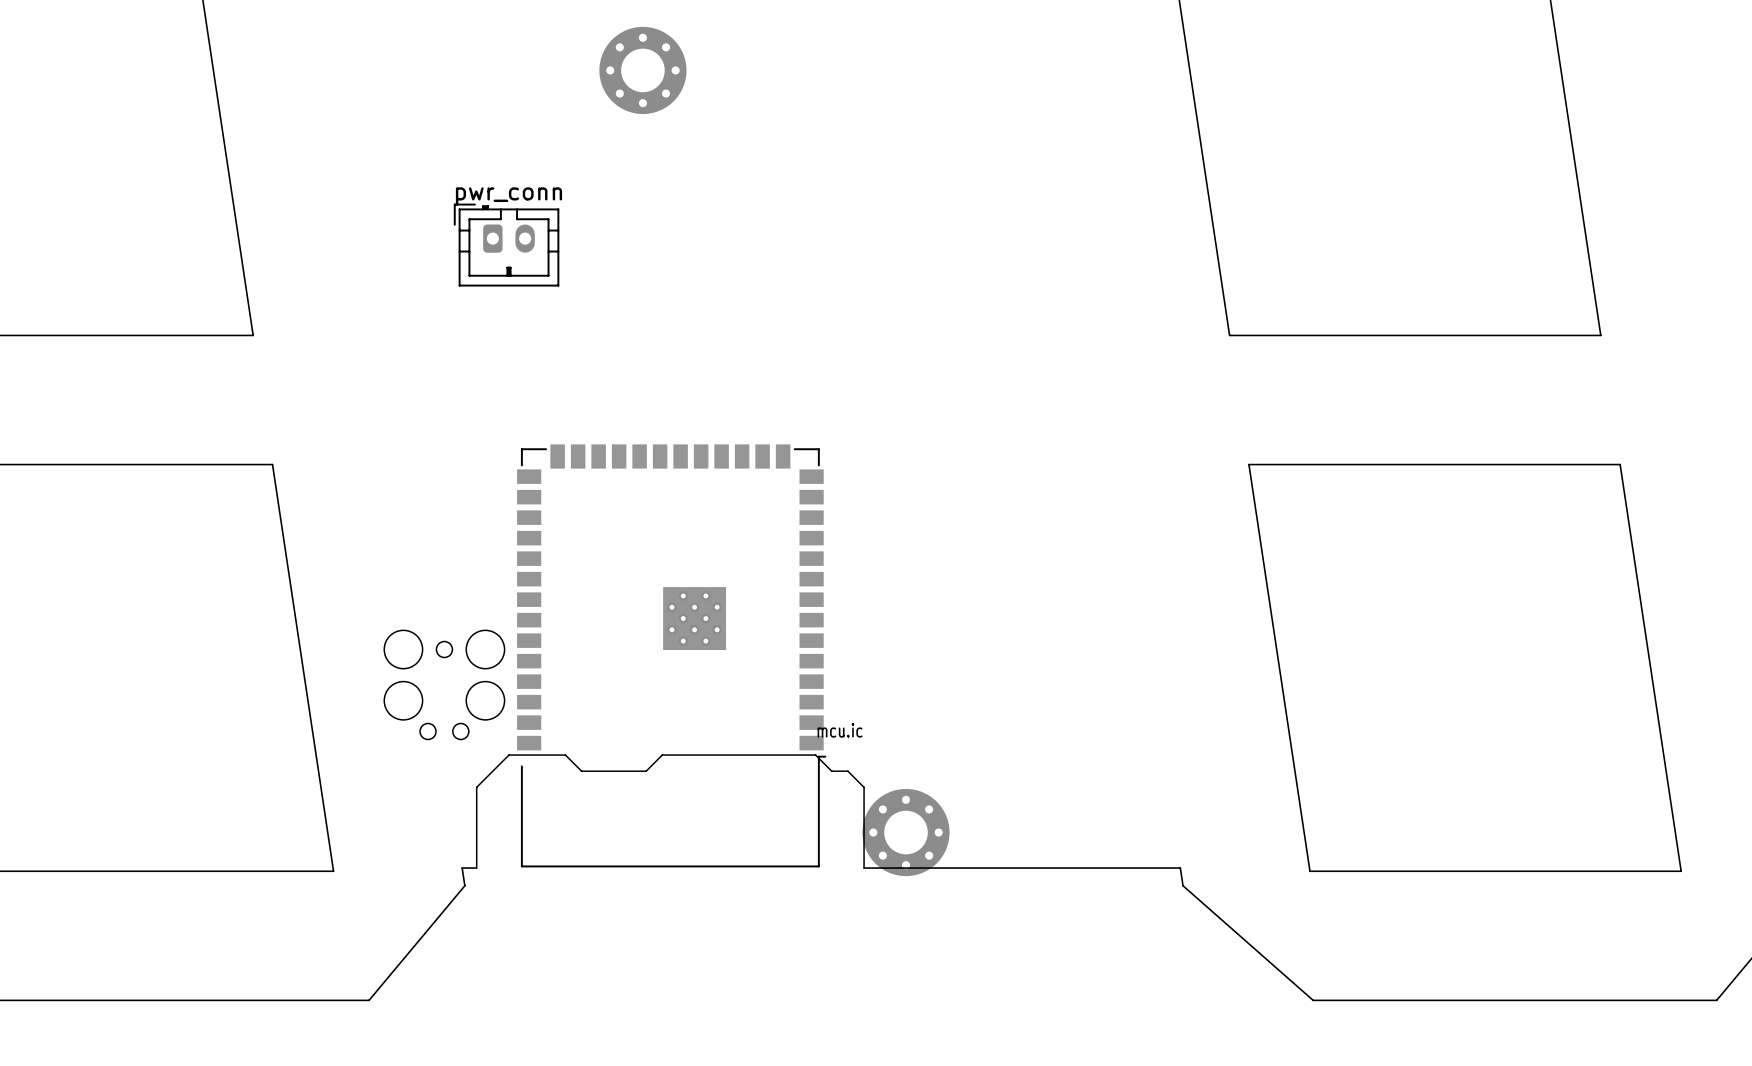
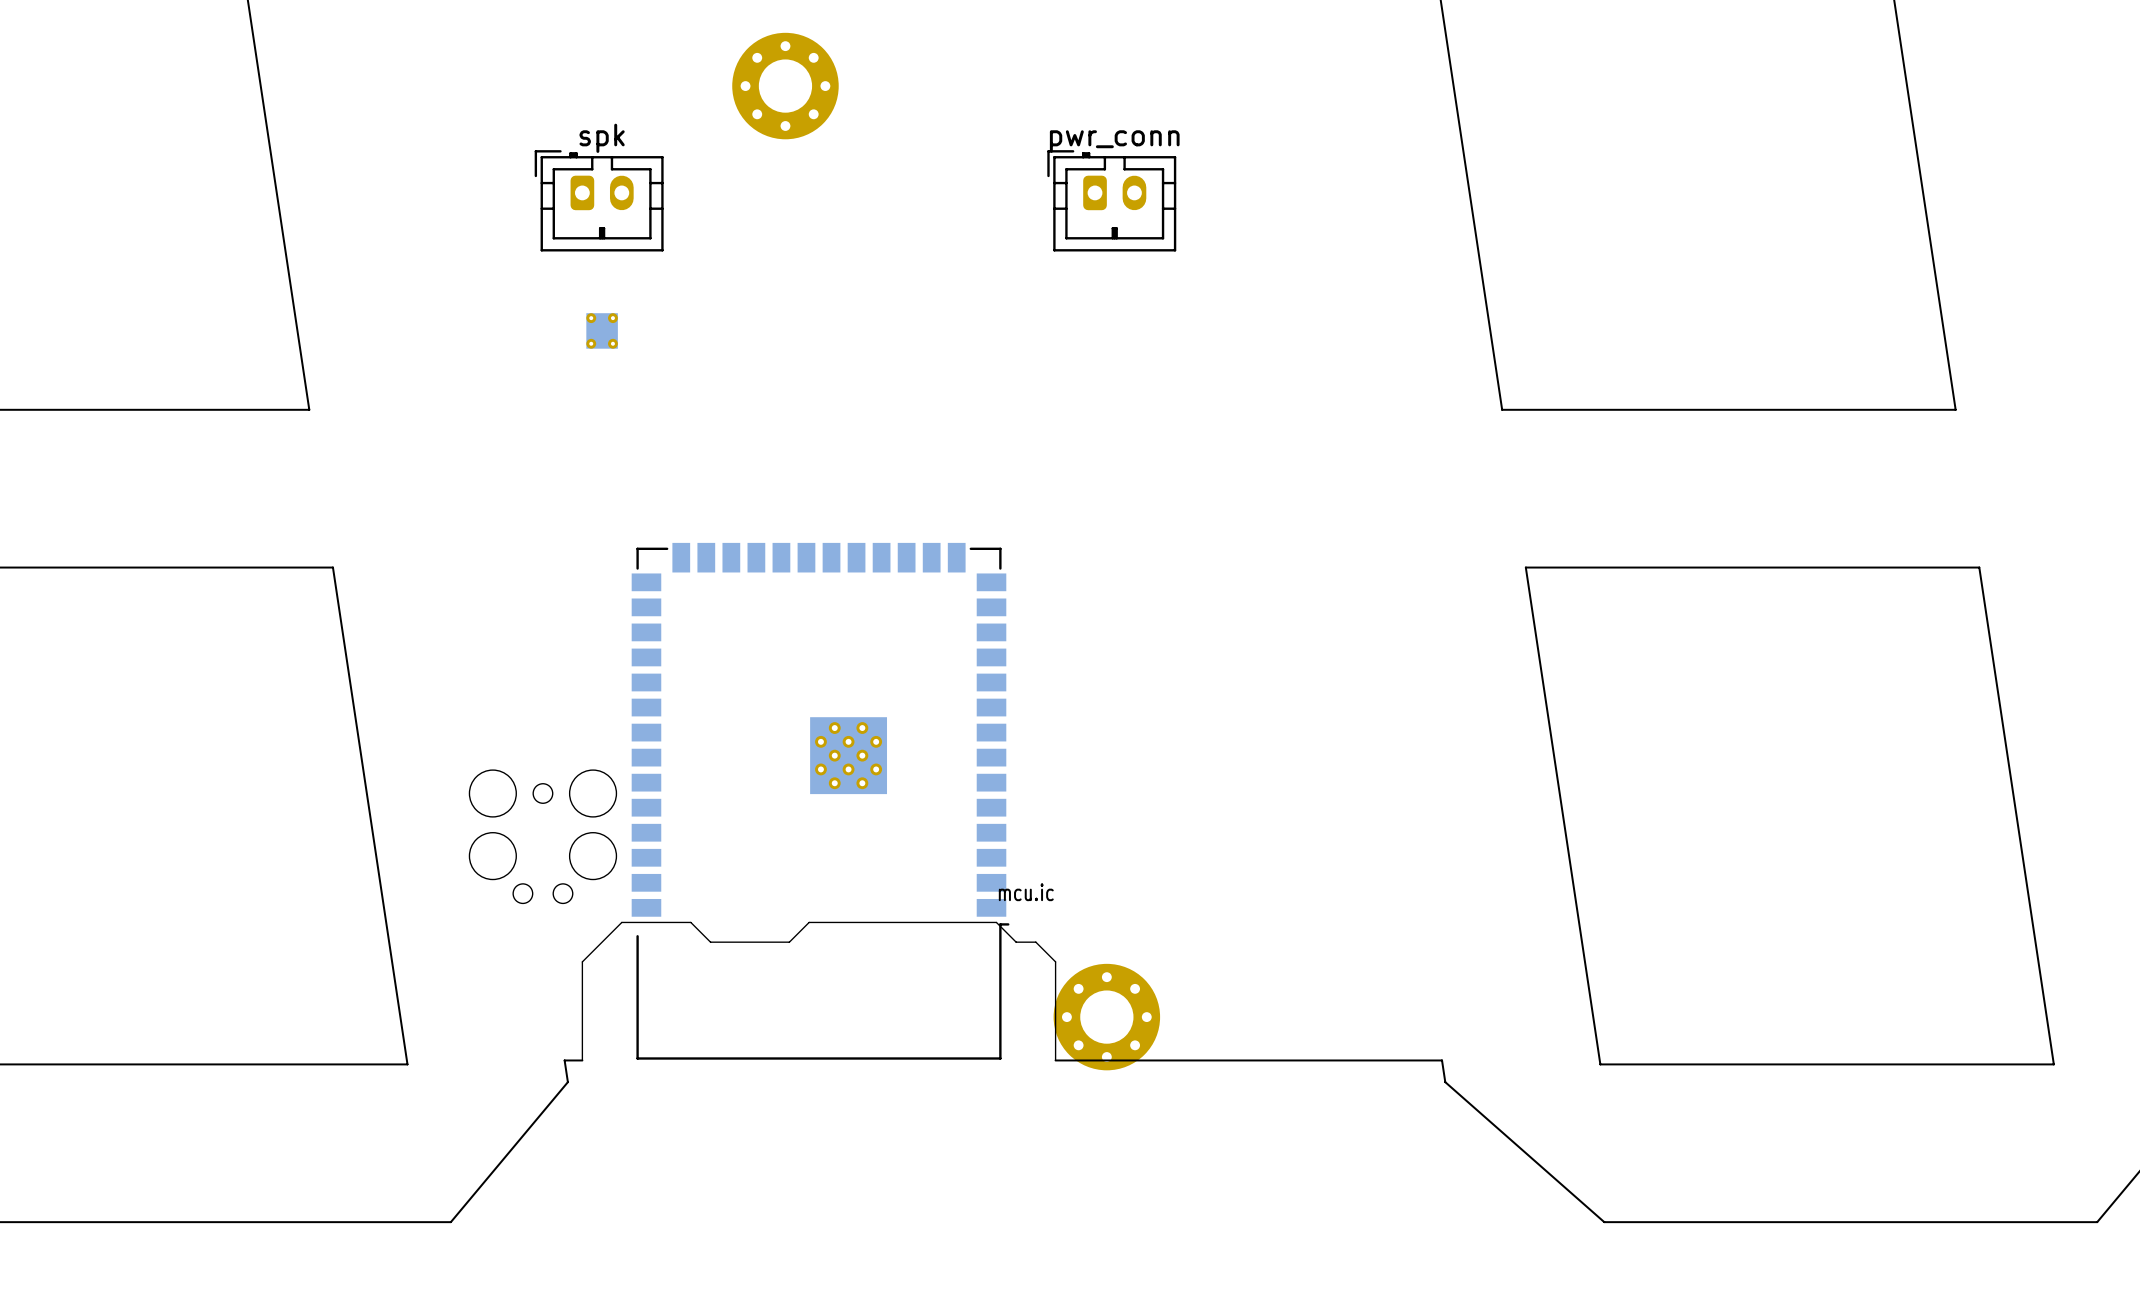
spk: none -> (599, 200)
pwr_conn: none -> (1111, 200)
pwr_conn: (506, 245) -> none
part: none -> (602, 330)

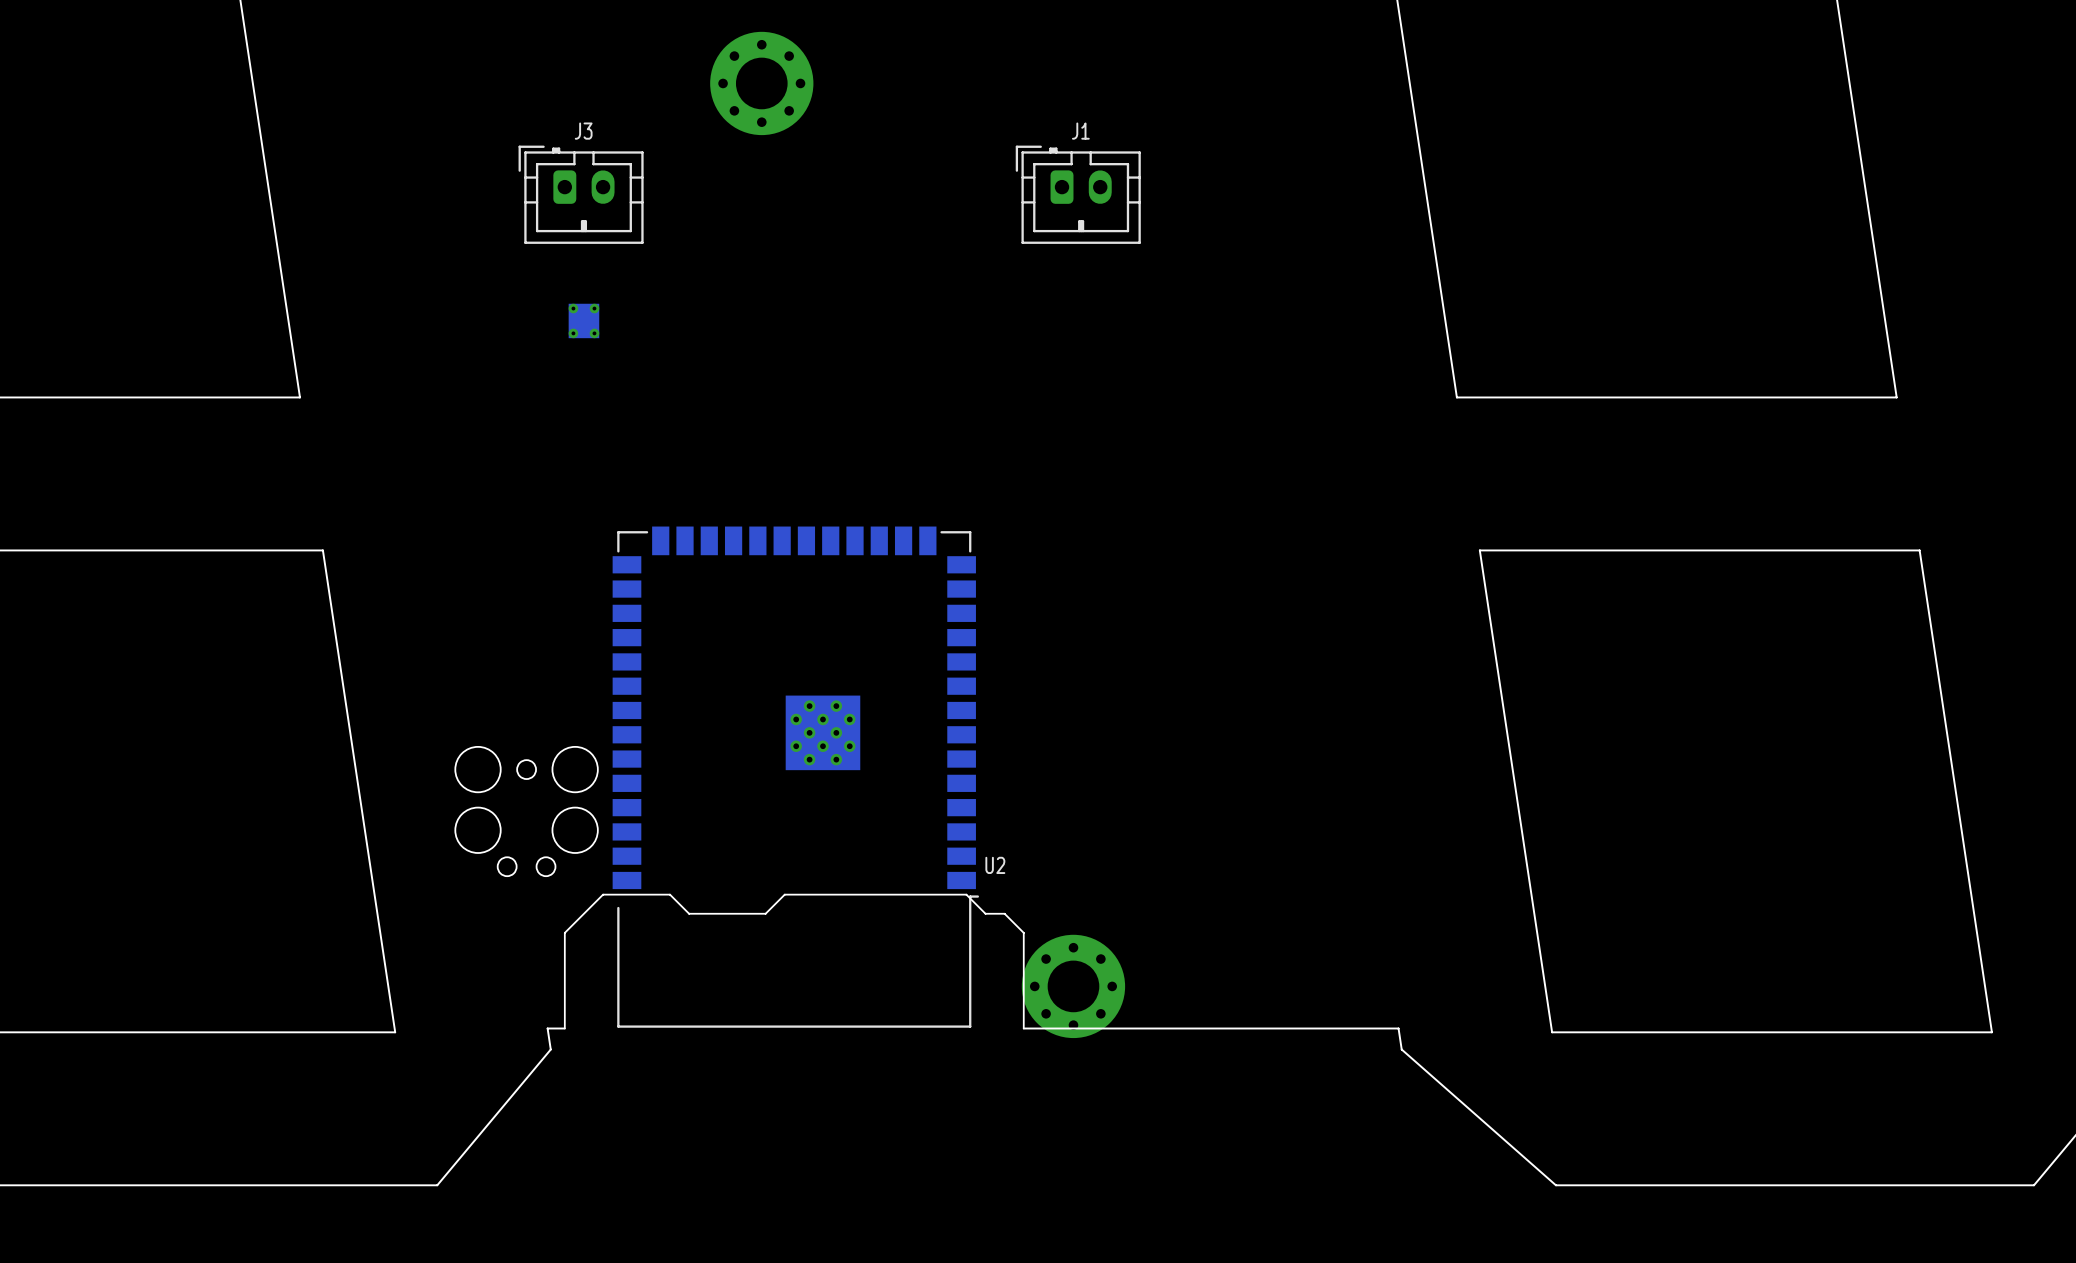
spk name: spk (602, 138) -> J3 (583, 131)
pwr_conn name: pwr_conn (1114, 141) -> J1 (1080, 131)
mcu.ic name: mcu.ic (1026, 892) -> U2 (995, 865)

